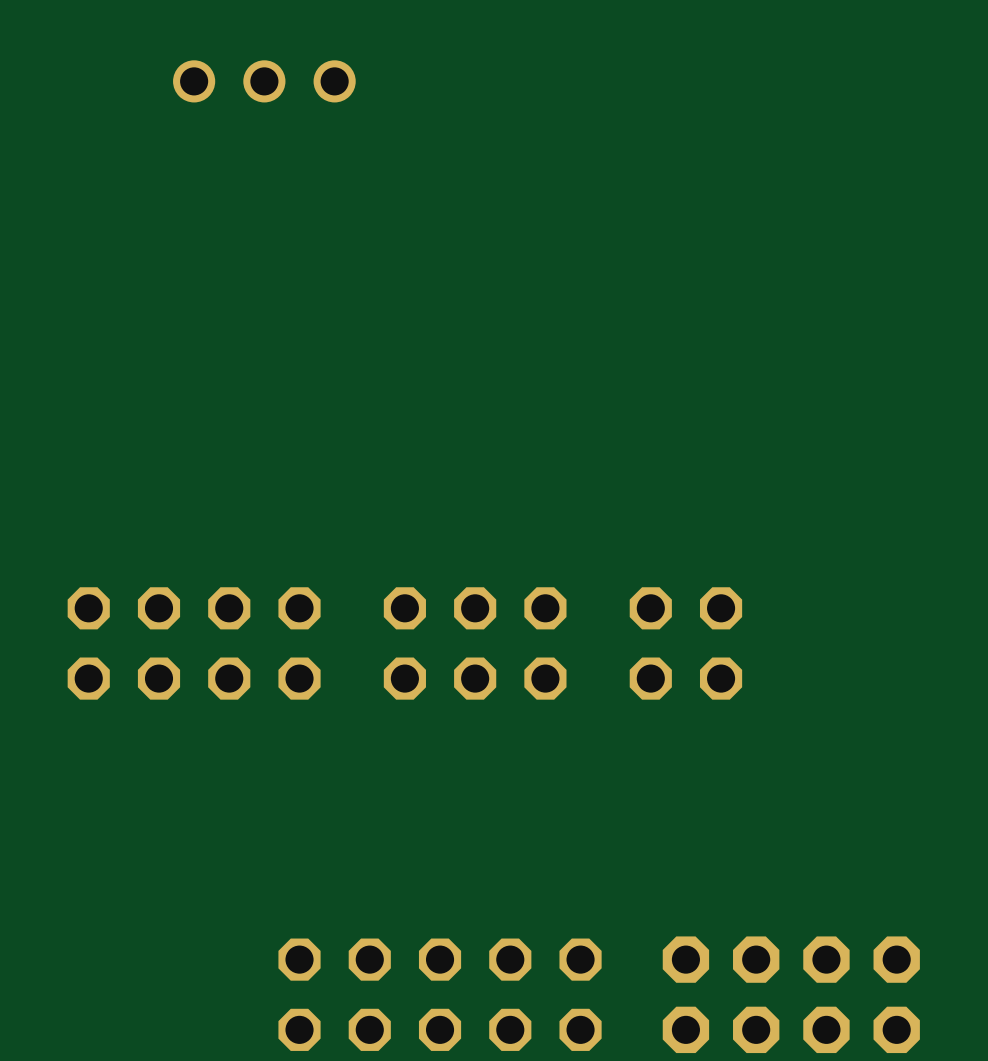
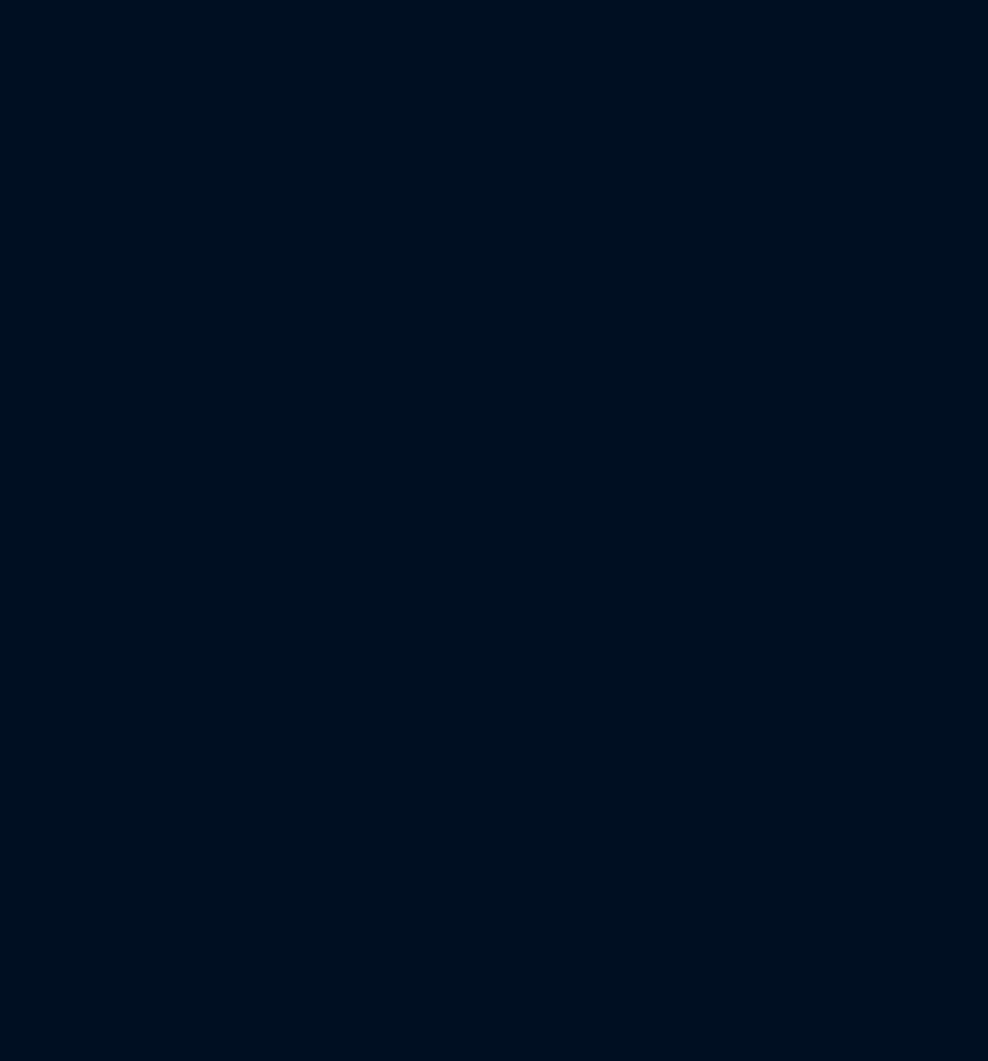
part: (264, 81) -> none
part: (194, 643) -> none
part: (475, 643) -> none
part: (685, 643) -> none
part: (440, 994) -> none
part: (791, 994) -> none

